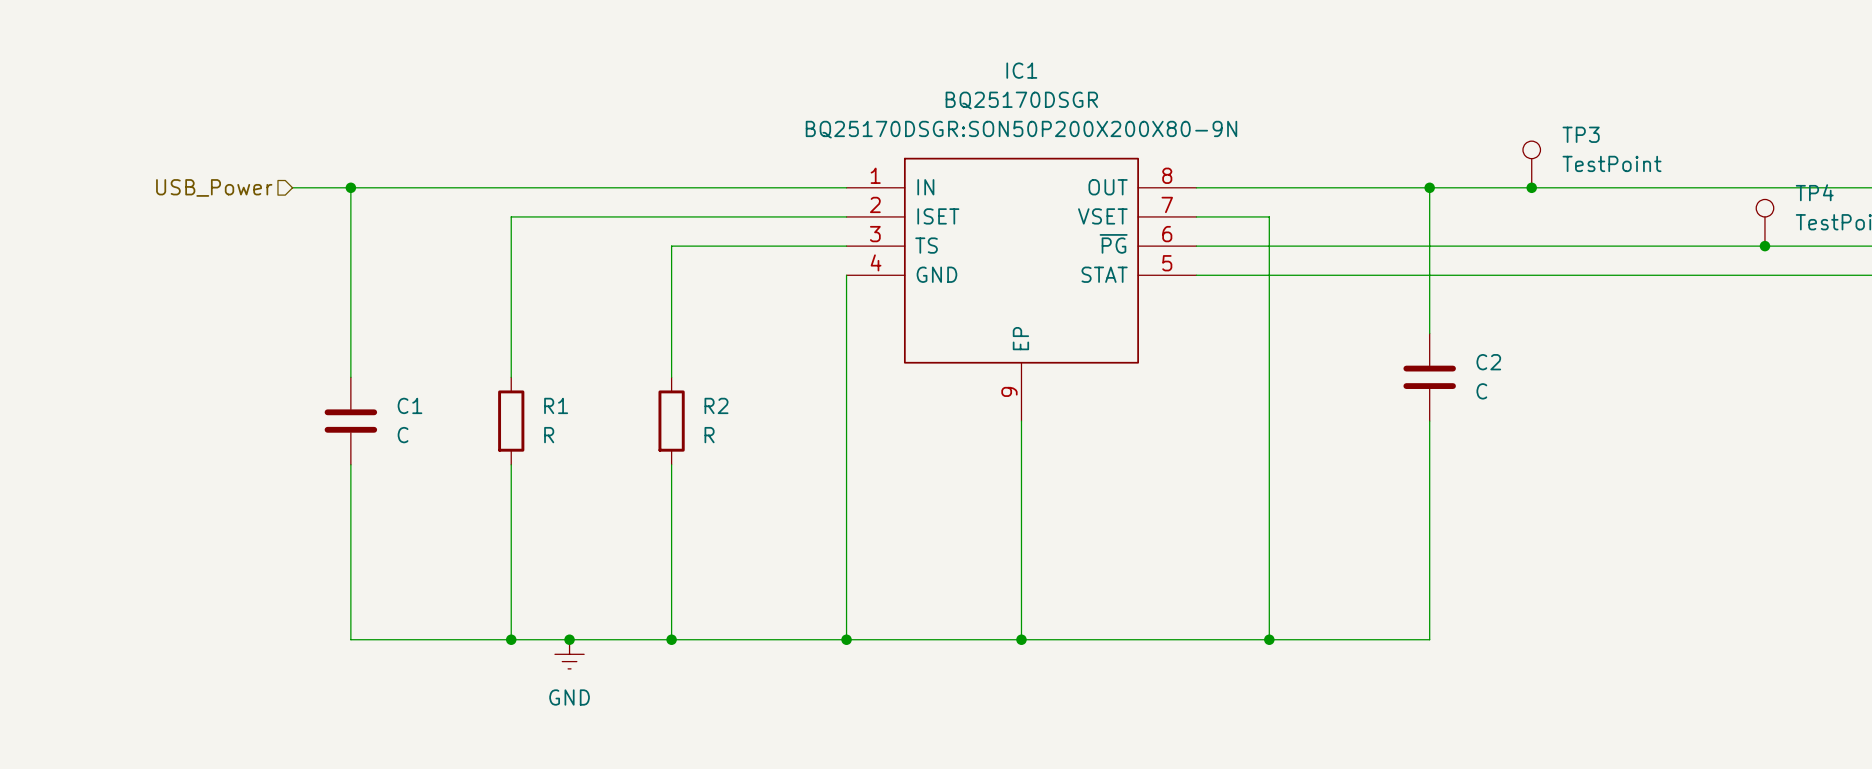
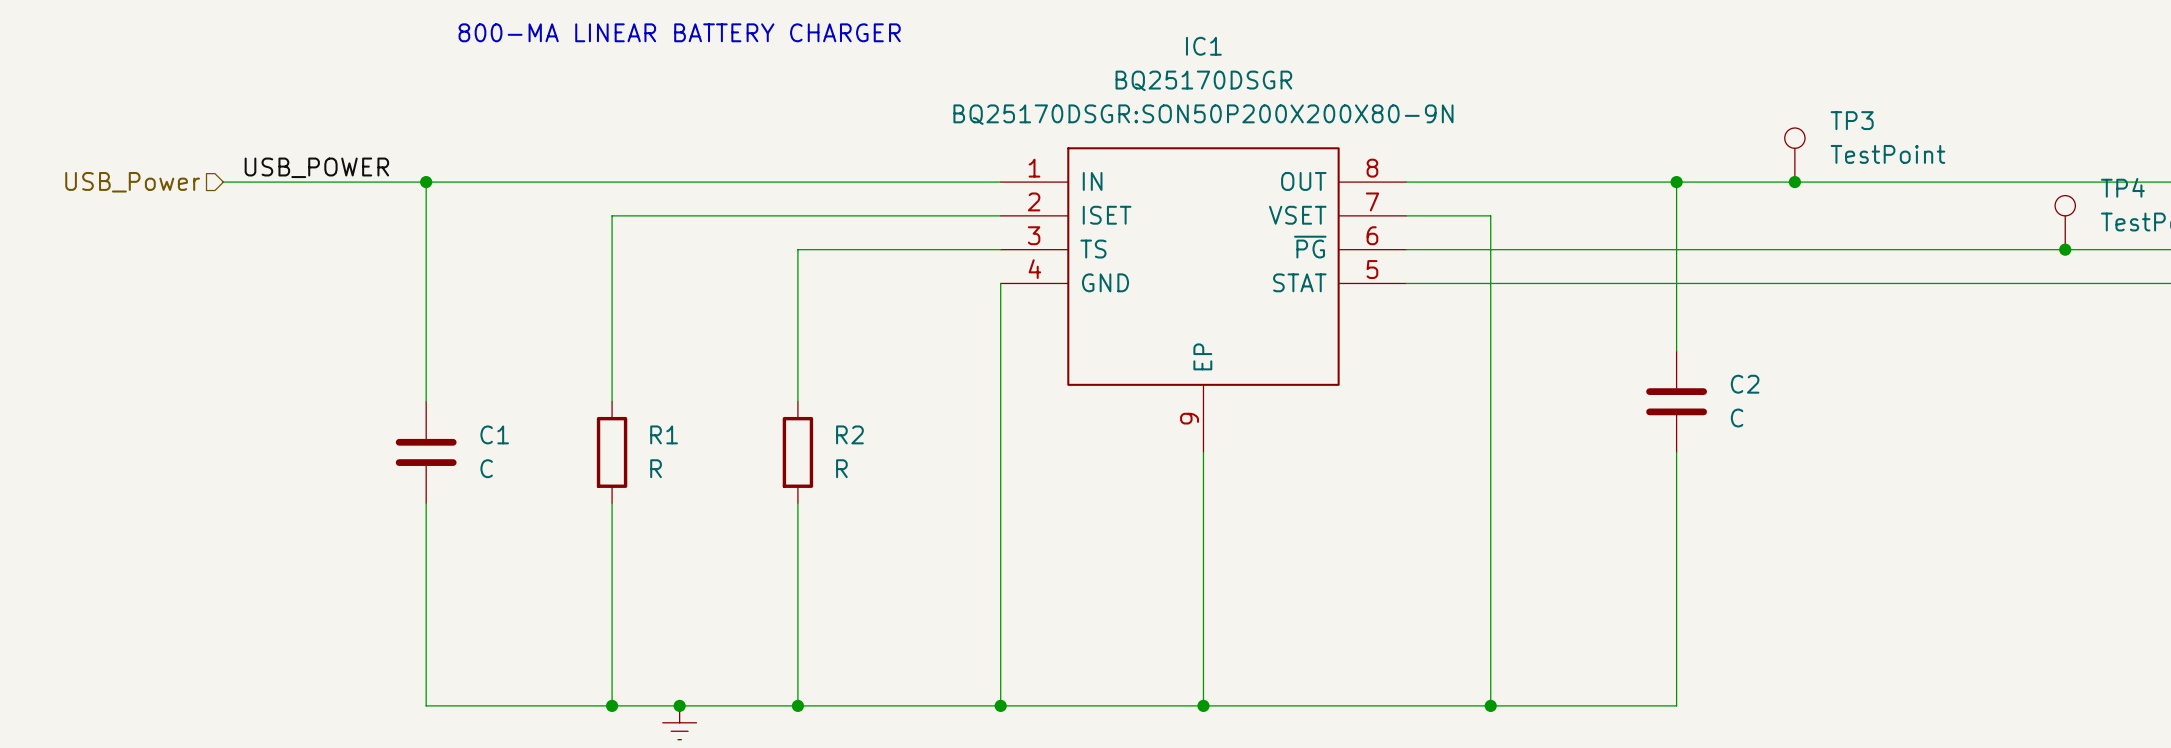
text: none -> 800-MA LINEAR BATTERY CHARGER (679, 32)
label: none -> USB_POWER (316, 167)
wire: none -> (223, 182) (358, 182)
hierarchical label position: USB_Power (214, 187) -> USB_Power (132, 182)

